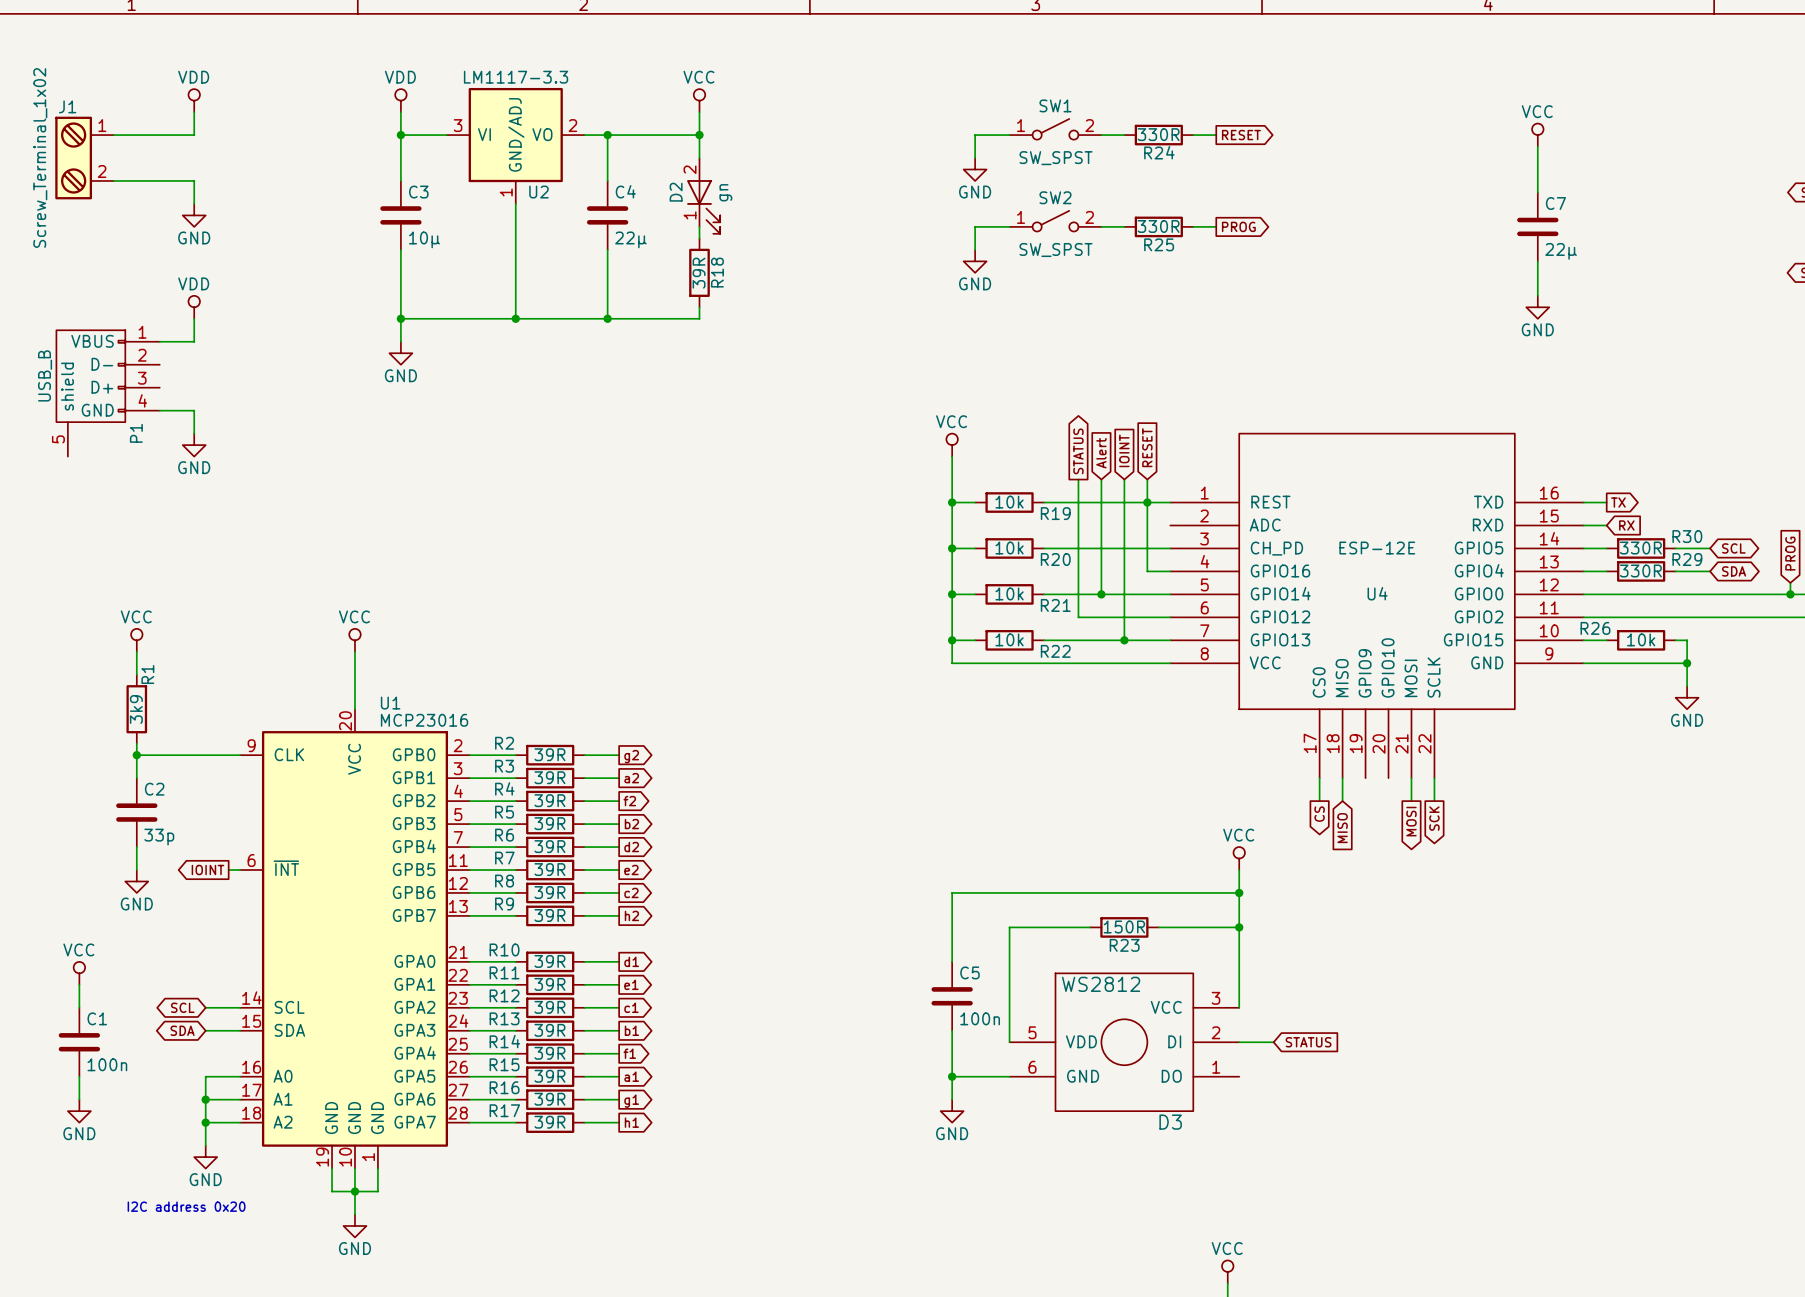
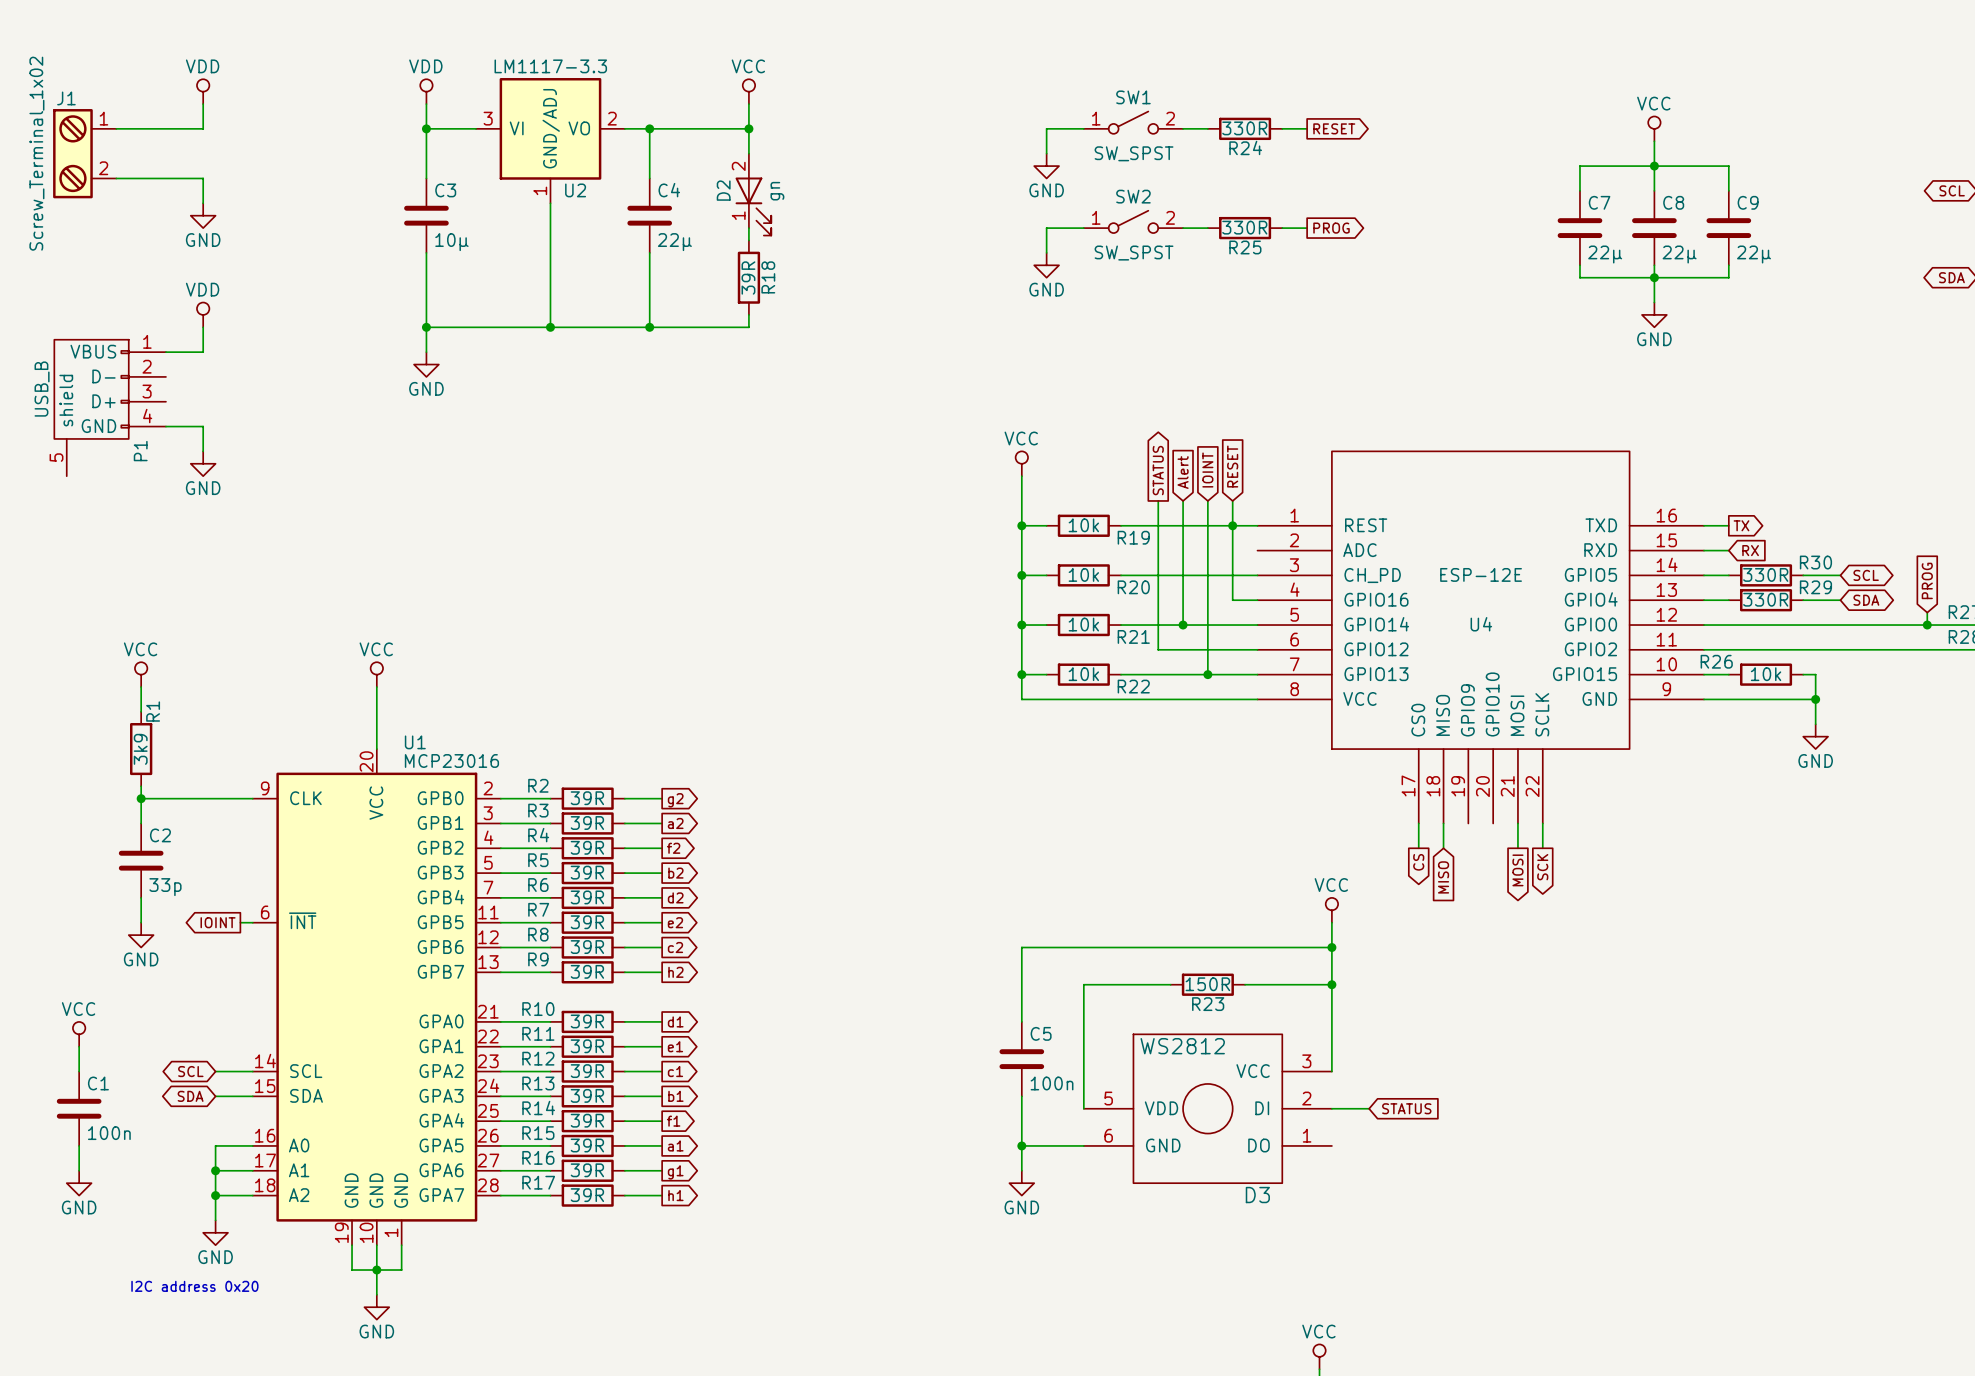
junction: none -> (1654, 166)
wire: none -> (1579, 190) (1579, 166) (1728, 166) (1728, 190)
C7 name: C7 (1555, 203) -> C8 (1673, 202)
C7: none -> 22µ (1579, 228)
C9: none -> 22µ (1728, 228)
wire: none -> (1579, 265) (1579, 277) (1728, 277) (1728, 265)
junction: none -> (1654, 277)

